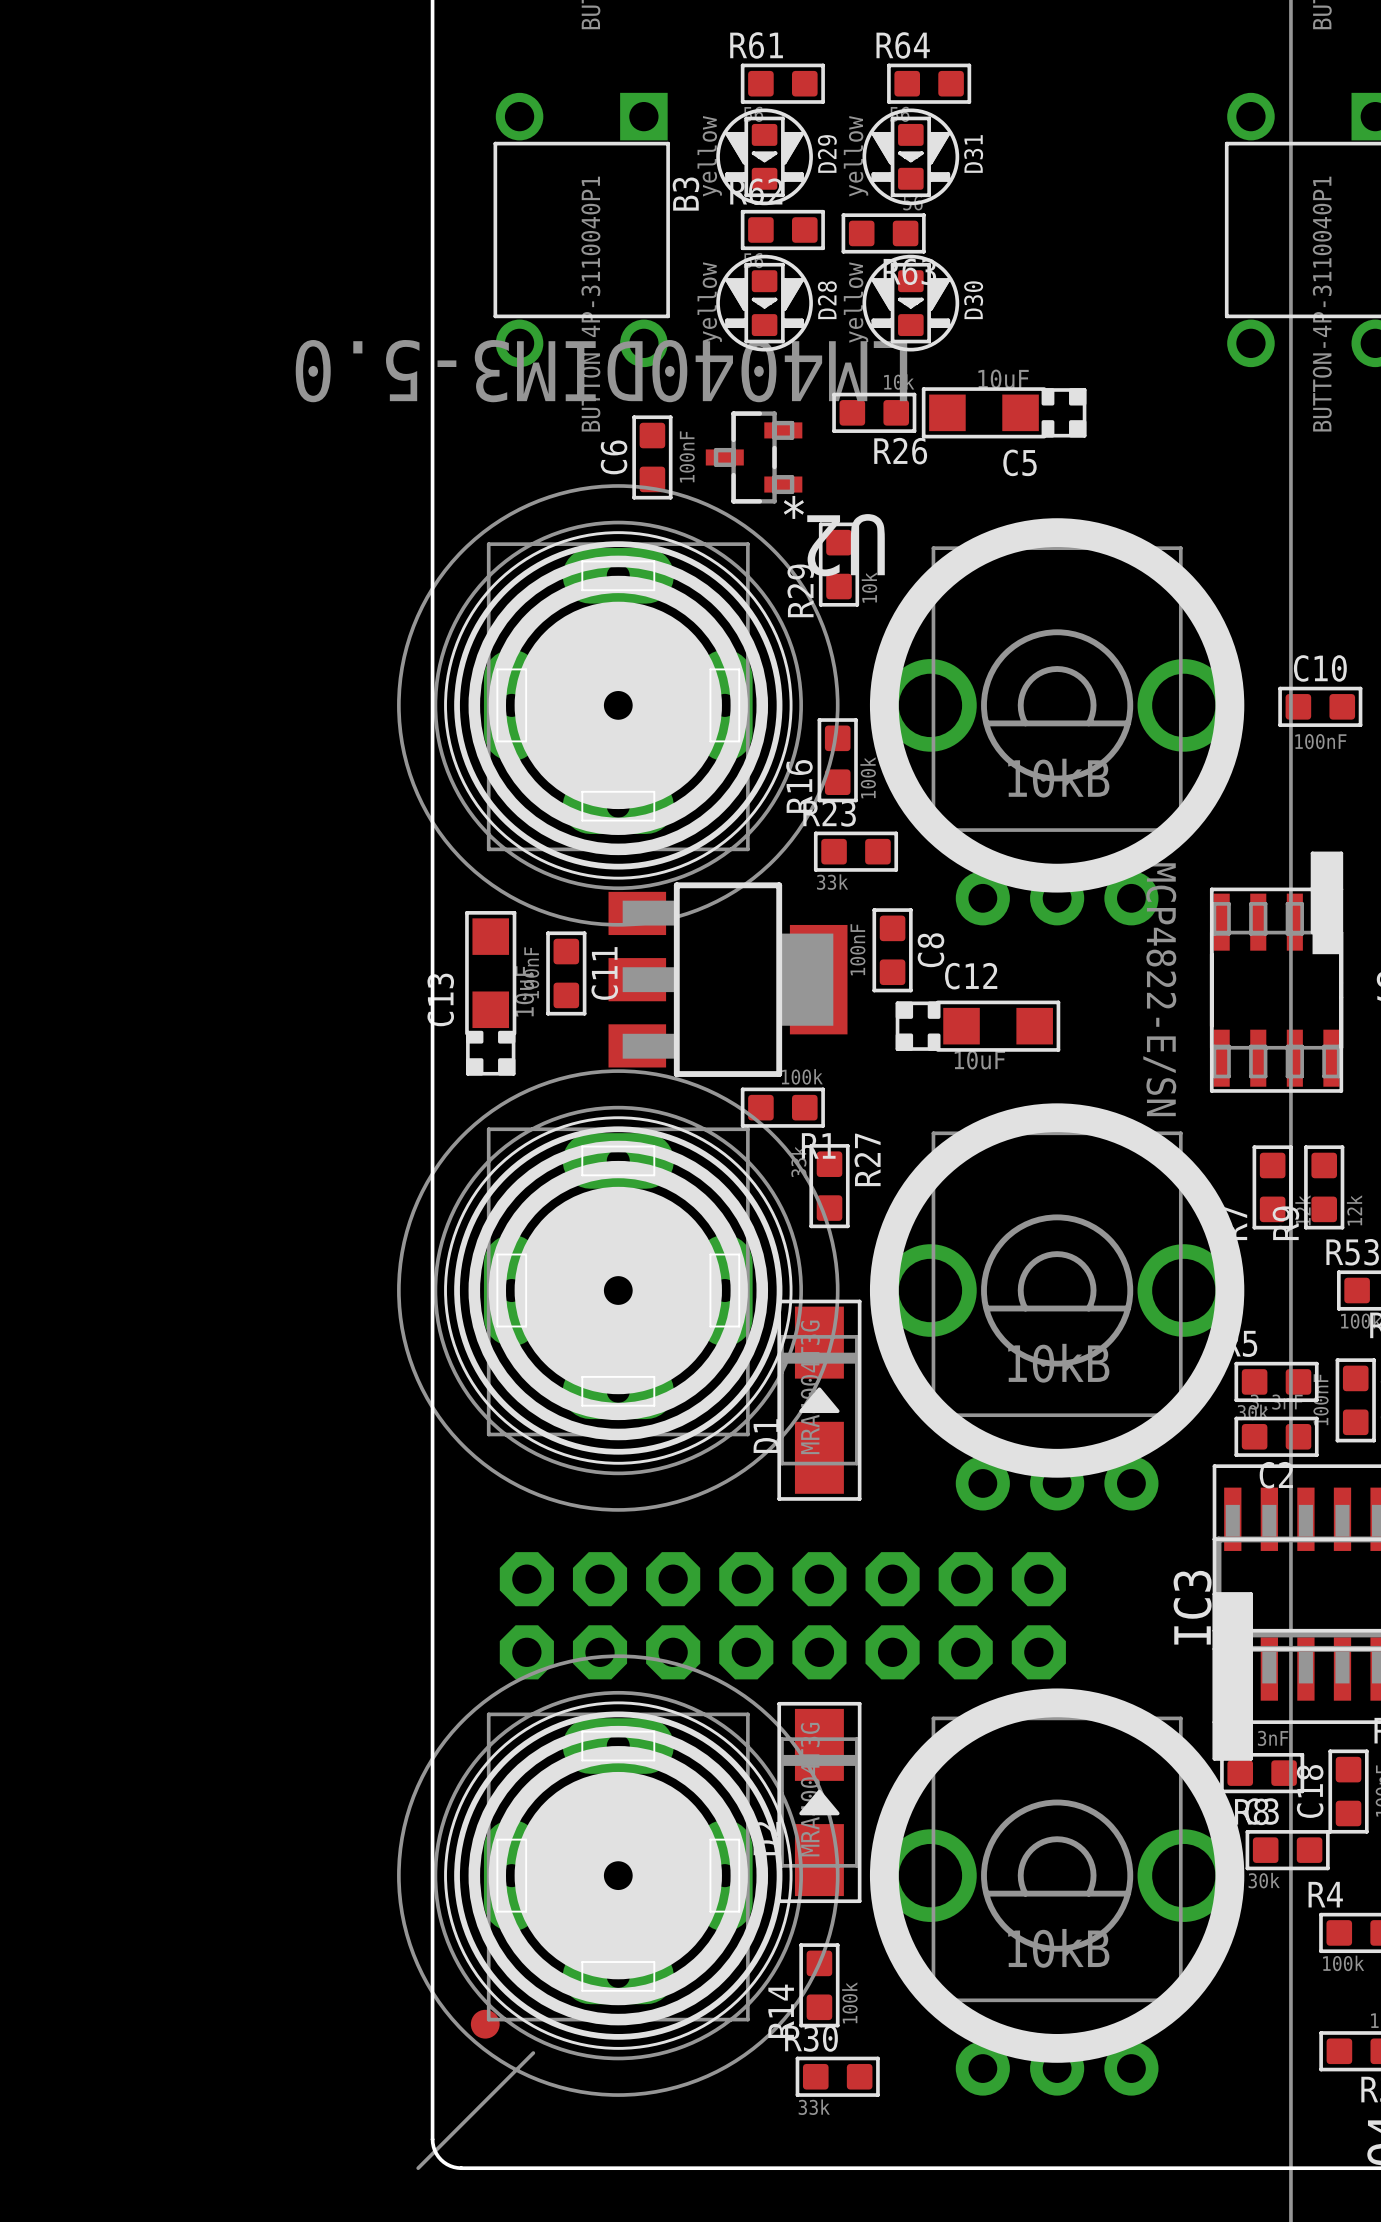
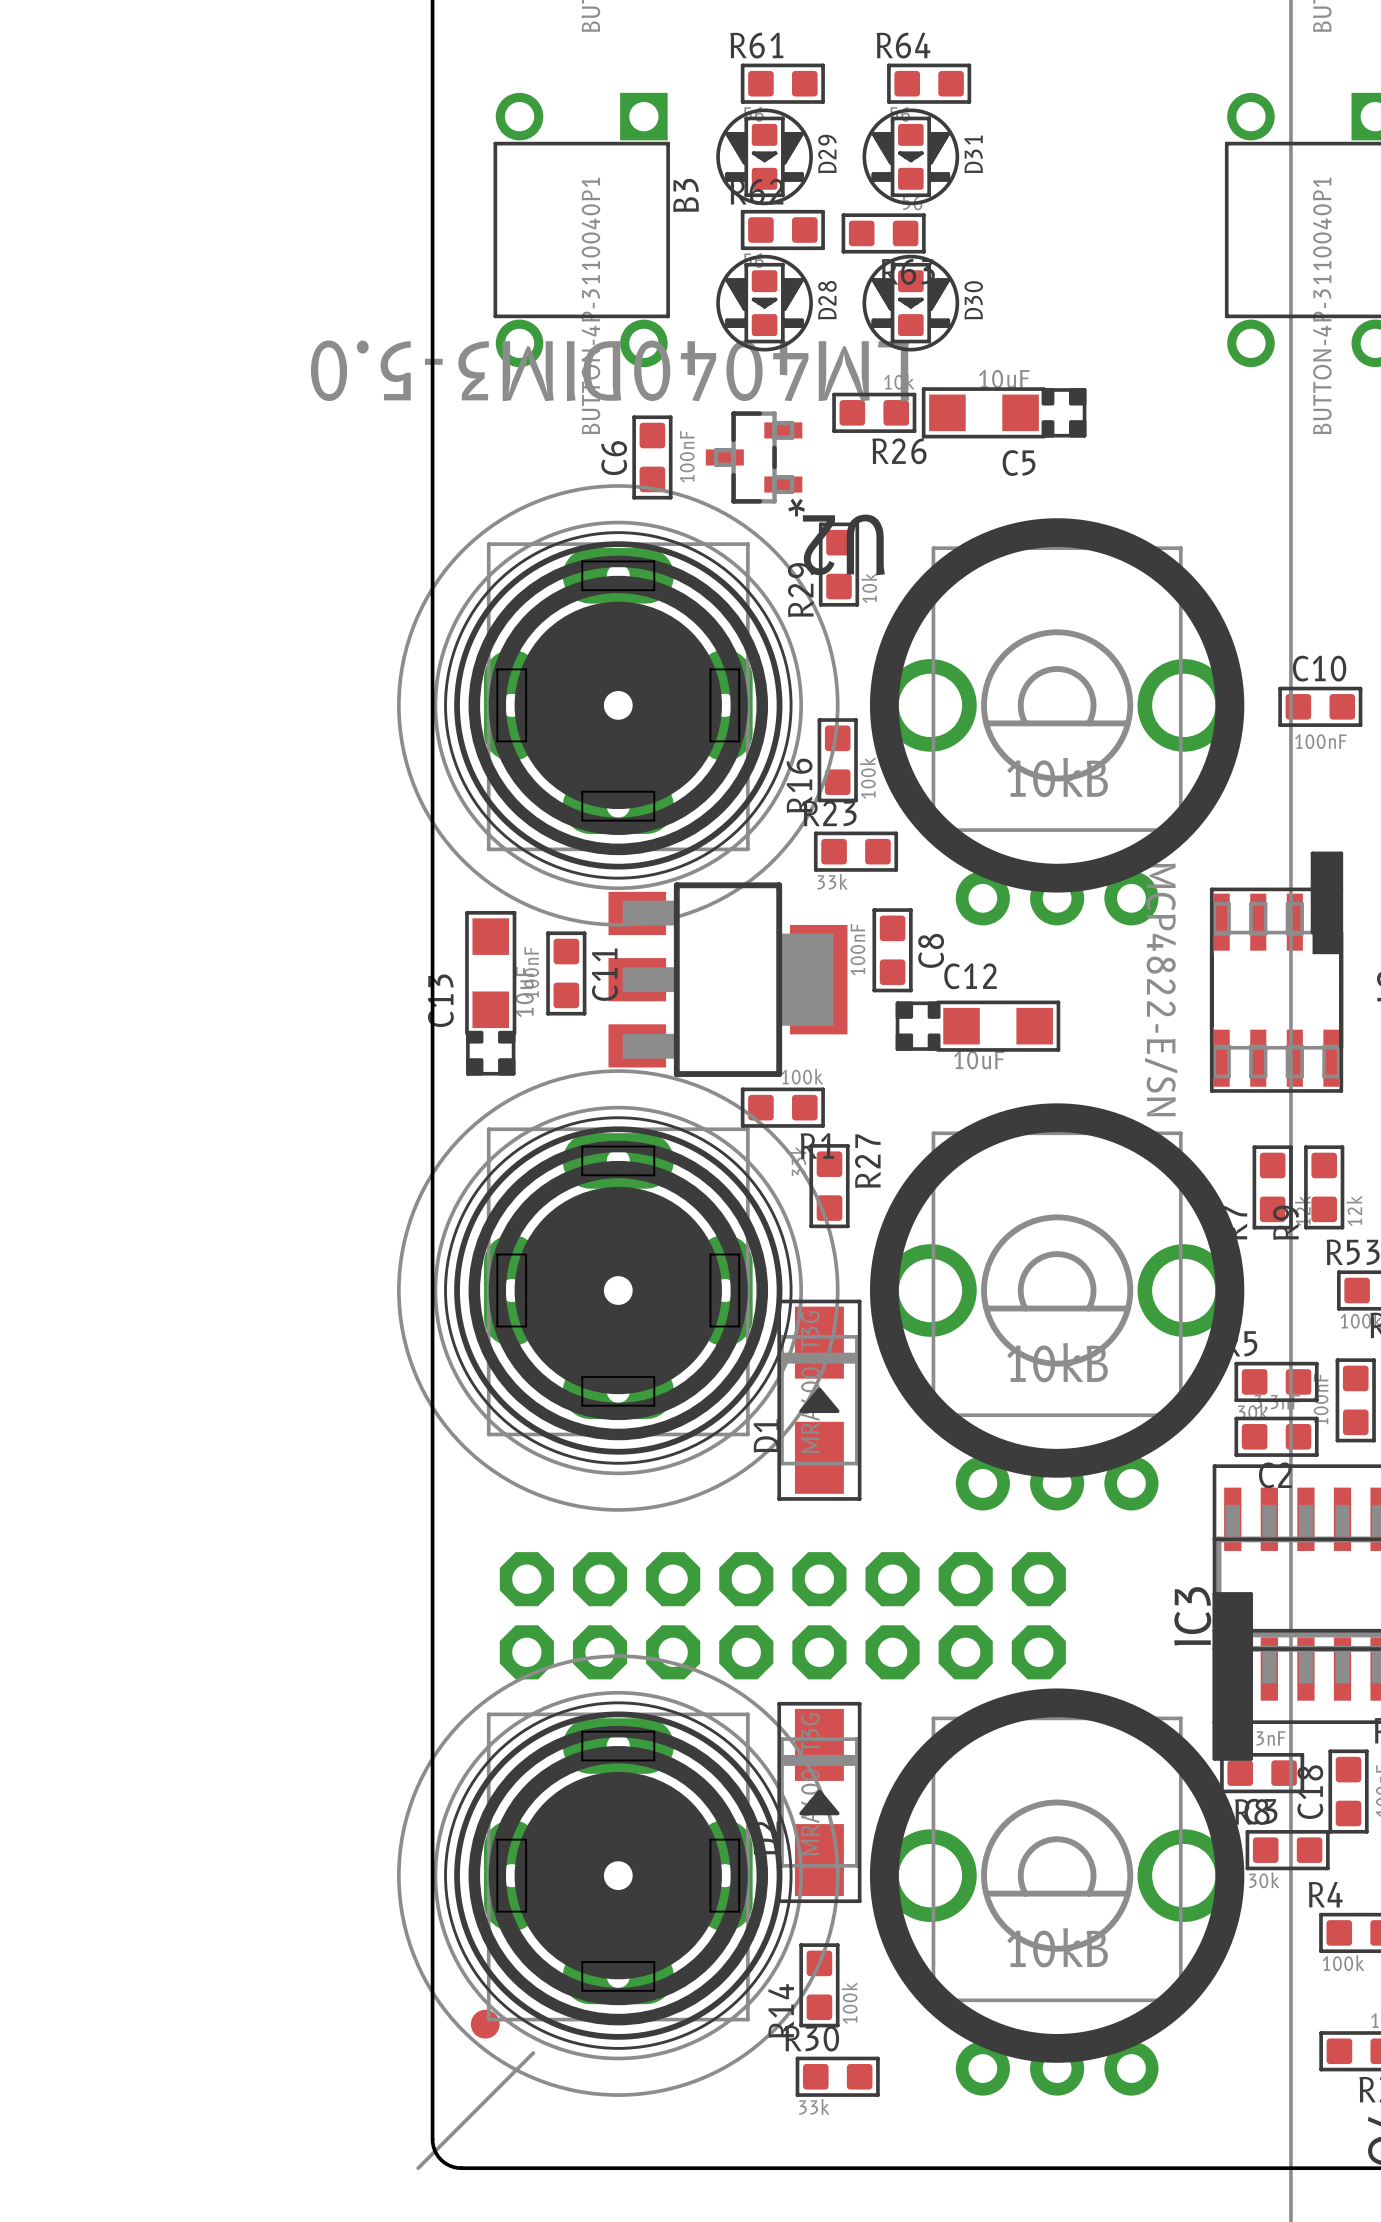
D29 value: yellow (709, 156) -> none
D31 value: yellow (856, 156) -> none
D28 value: yellow (709, 302) -> none
D30 value: yellow (856, 302) -> none

